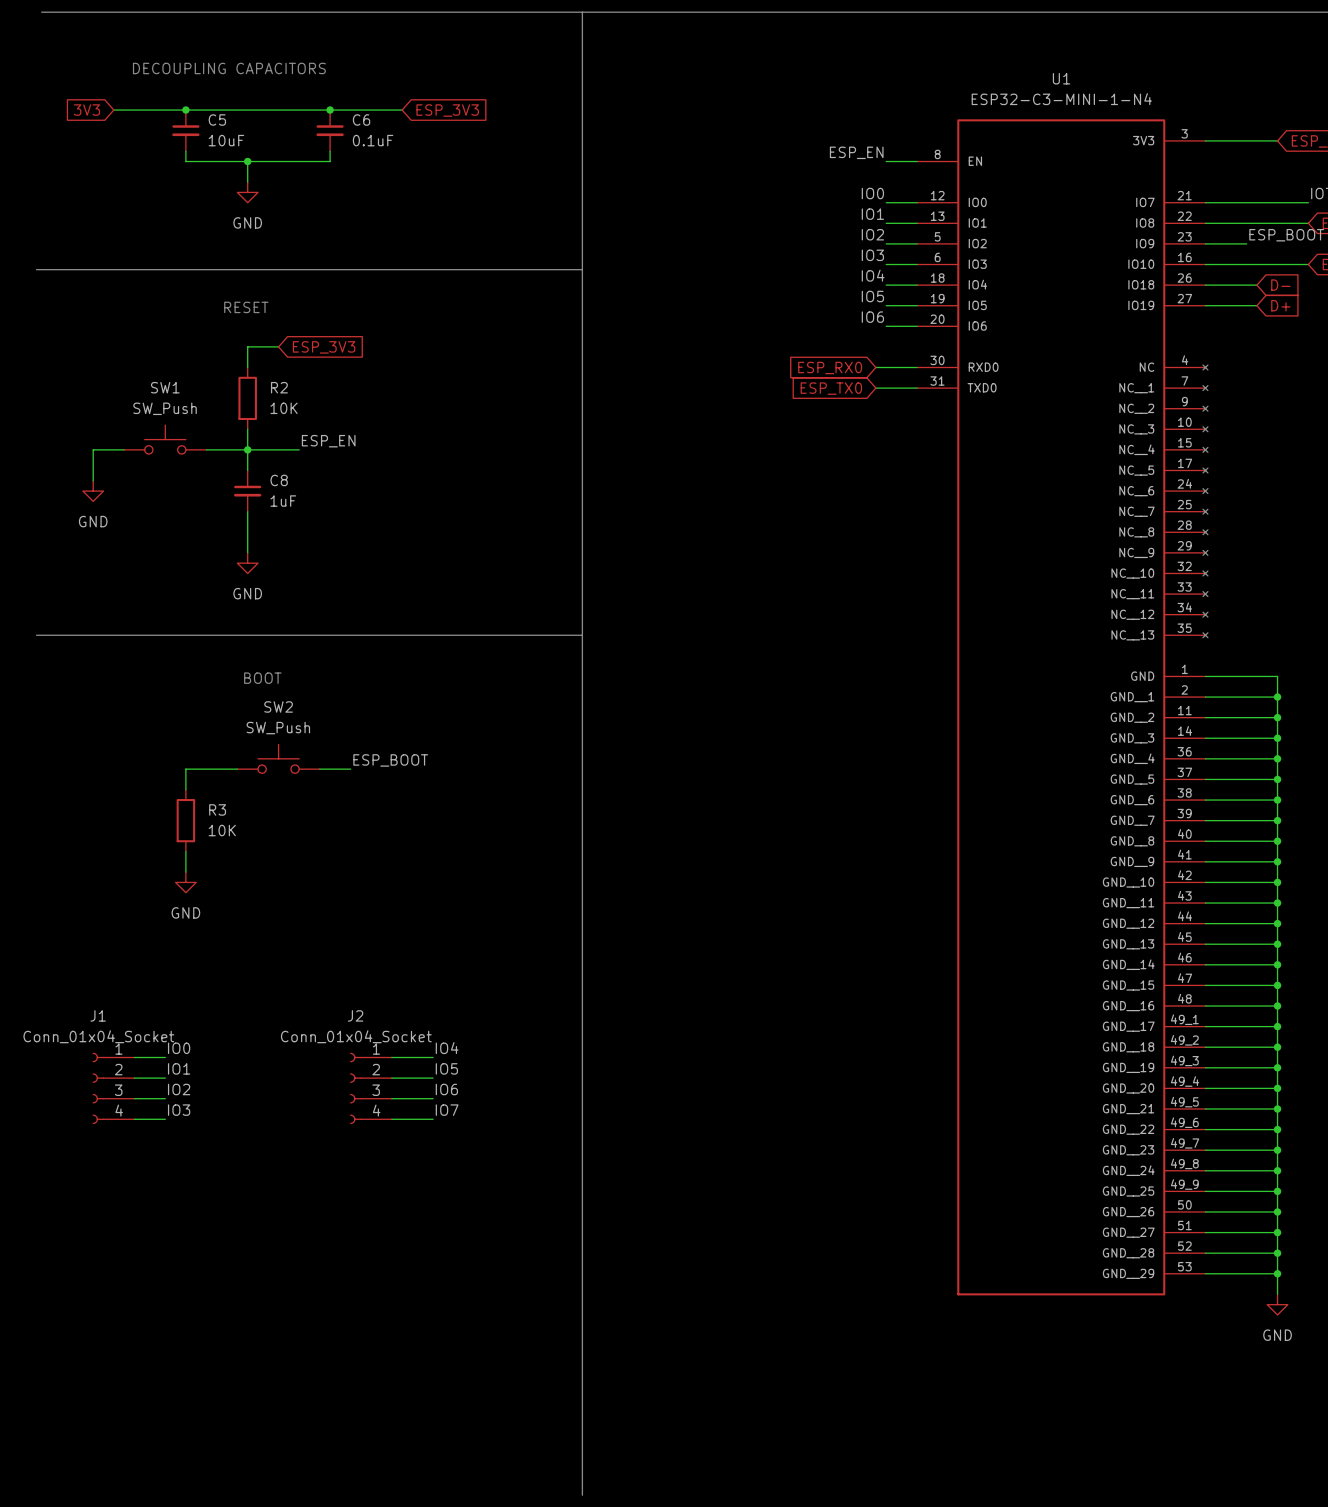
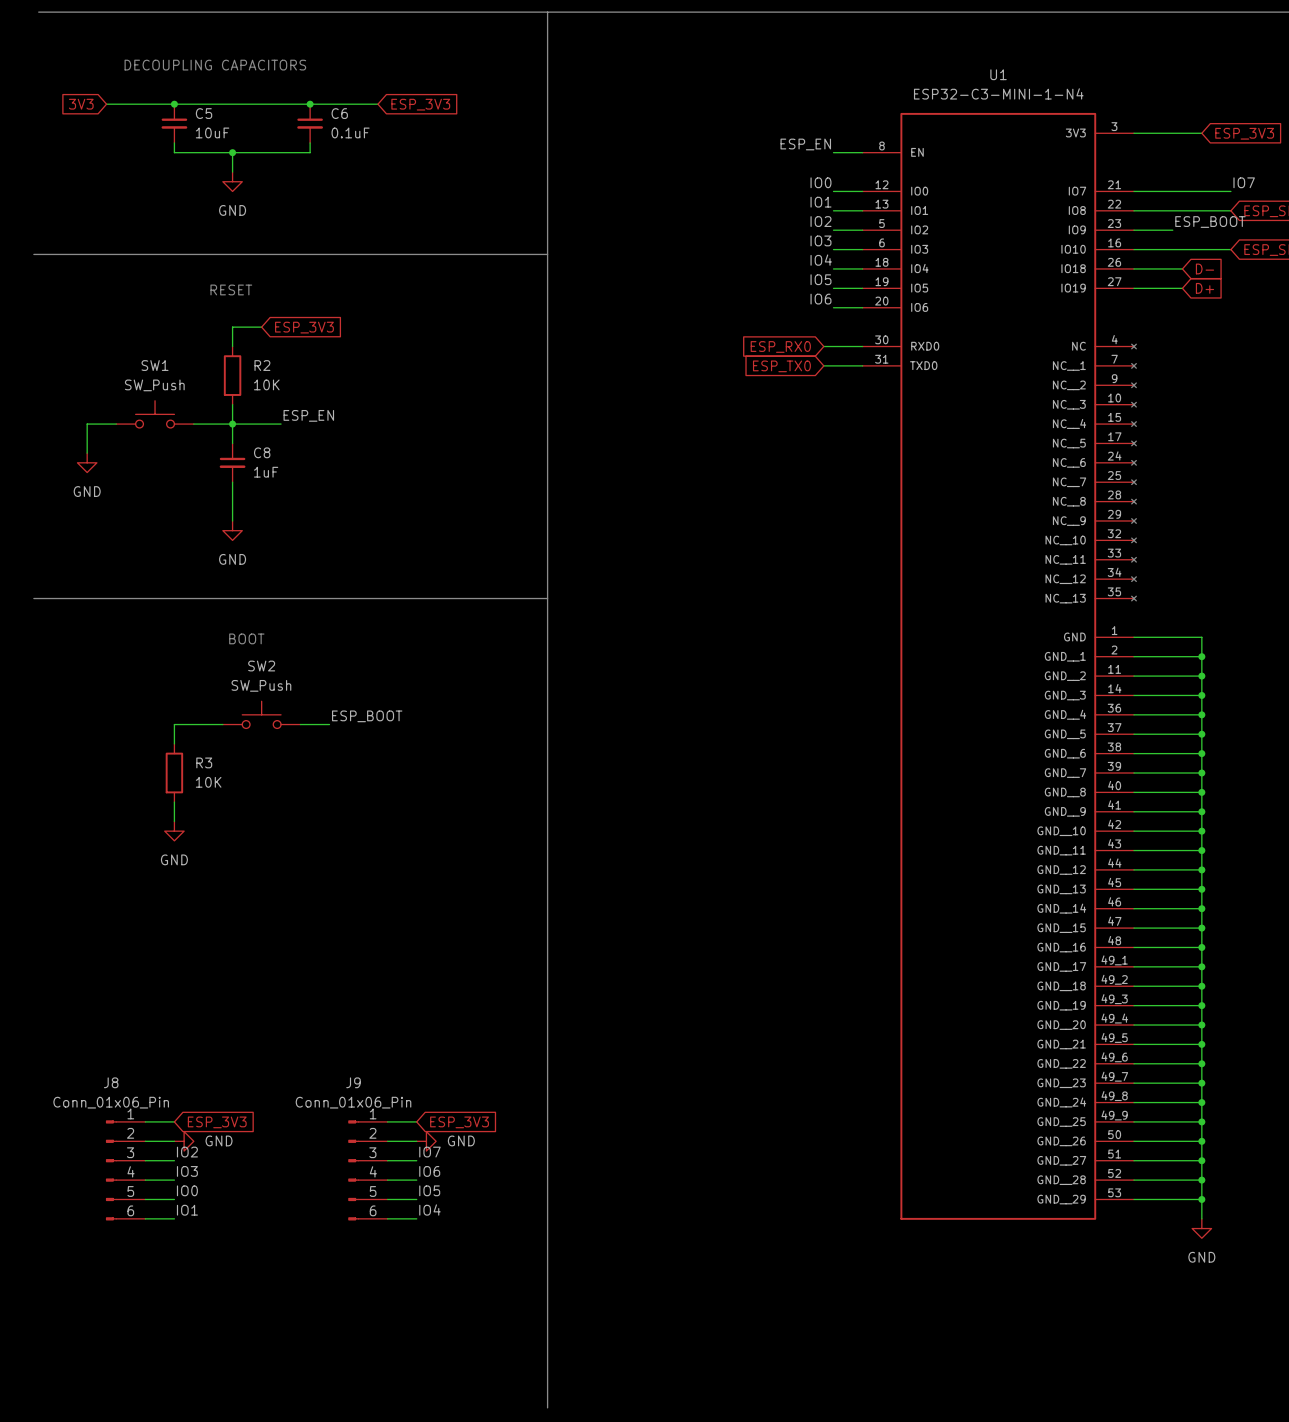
label: IO0 (179, 1048) -> none
label: IO4 (447, 1048) -> none
wire: (134, 1057) (165, 1057) -> (145, 1121) (174, 1121)
wire: (391, 1057) (433, 1057) -> none
label: IO1 (179, 1068) -> none
label position: IO5 (446, 1068) -> IO5 (429, 1190)
wire: (134, 1078) (165, 1078) -> (145, 1141) (174, 1141)
wire: (391, 1078) (433, 1078) -> none
J1: Conn_01x04_Socket (113, 1088) -> none
J2: Conn_01x04_Socket (370, 1088) -> none
label position: IO2 (179, 1089) -> IO2 (187, 1152)
label position: IO6 (446, 1089) -> IO6 (429, 1171)
wire: (134, 1098) (165, 1098) -> (145, 1160) (174, 1160)
wire: (391, 1098) (433, 1098) -> none
label position: IO3 (179, 1110) -> IO3 (187, 1171)
label position: IO7 (447, 1110) -> IO7 (429, 1152)
wire: (134, 1119) (165, 1119) -> (145, 1180) (174, 1180)
wire: (391, 1119) (433, 1119) -> none
global label: none -> ESP_3V3 (217, 1122)
wire: none -> (387, 1121) (416, 1121)
global label: none -> ESP_3V3 (459, 1122)
power symbol: none -> GND (184, 1141)
wire: none -> (387, 1141) (416, 1141)
power symbol: none -> GND (426, 1141)
wire: none -> (387, 1160) (416, 1160)
J8: none -> Conn_01x06_Pin (125, 1170)
J9: none -> Conn_01x06_Pin (367, 1170)
wire: none -> (387, 1180) (416, 1180)
label: none -> IO0 (187, 1190)
wire: none -> (145, 1199) (174, 1199)
wire: none -> (387, 1199) (416, 1199)
label: none -> IO4 (429, 1209)
label: none -> IO1 (187, 1210)
wire: none -> (145, 1218) (174, 1218)
wire: none -> (387, 1218) (416, 1218)

